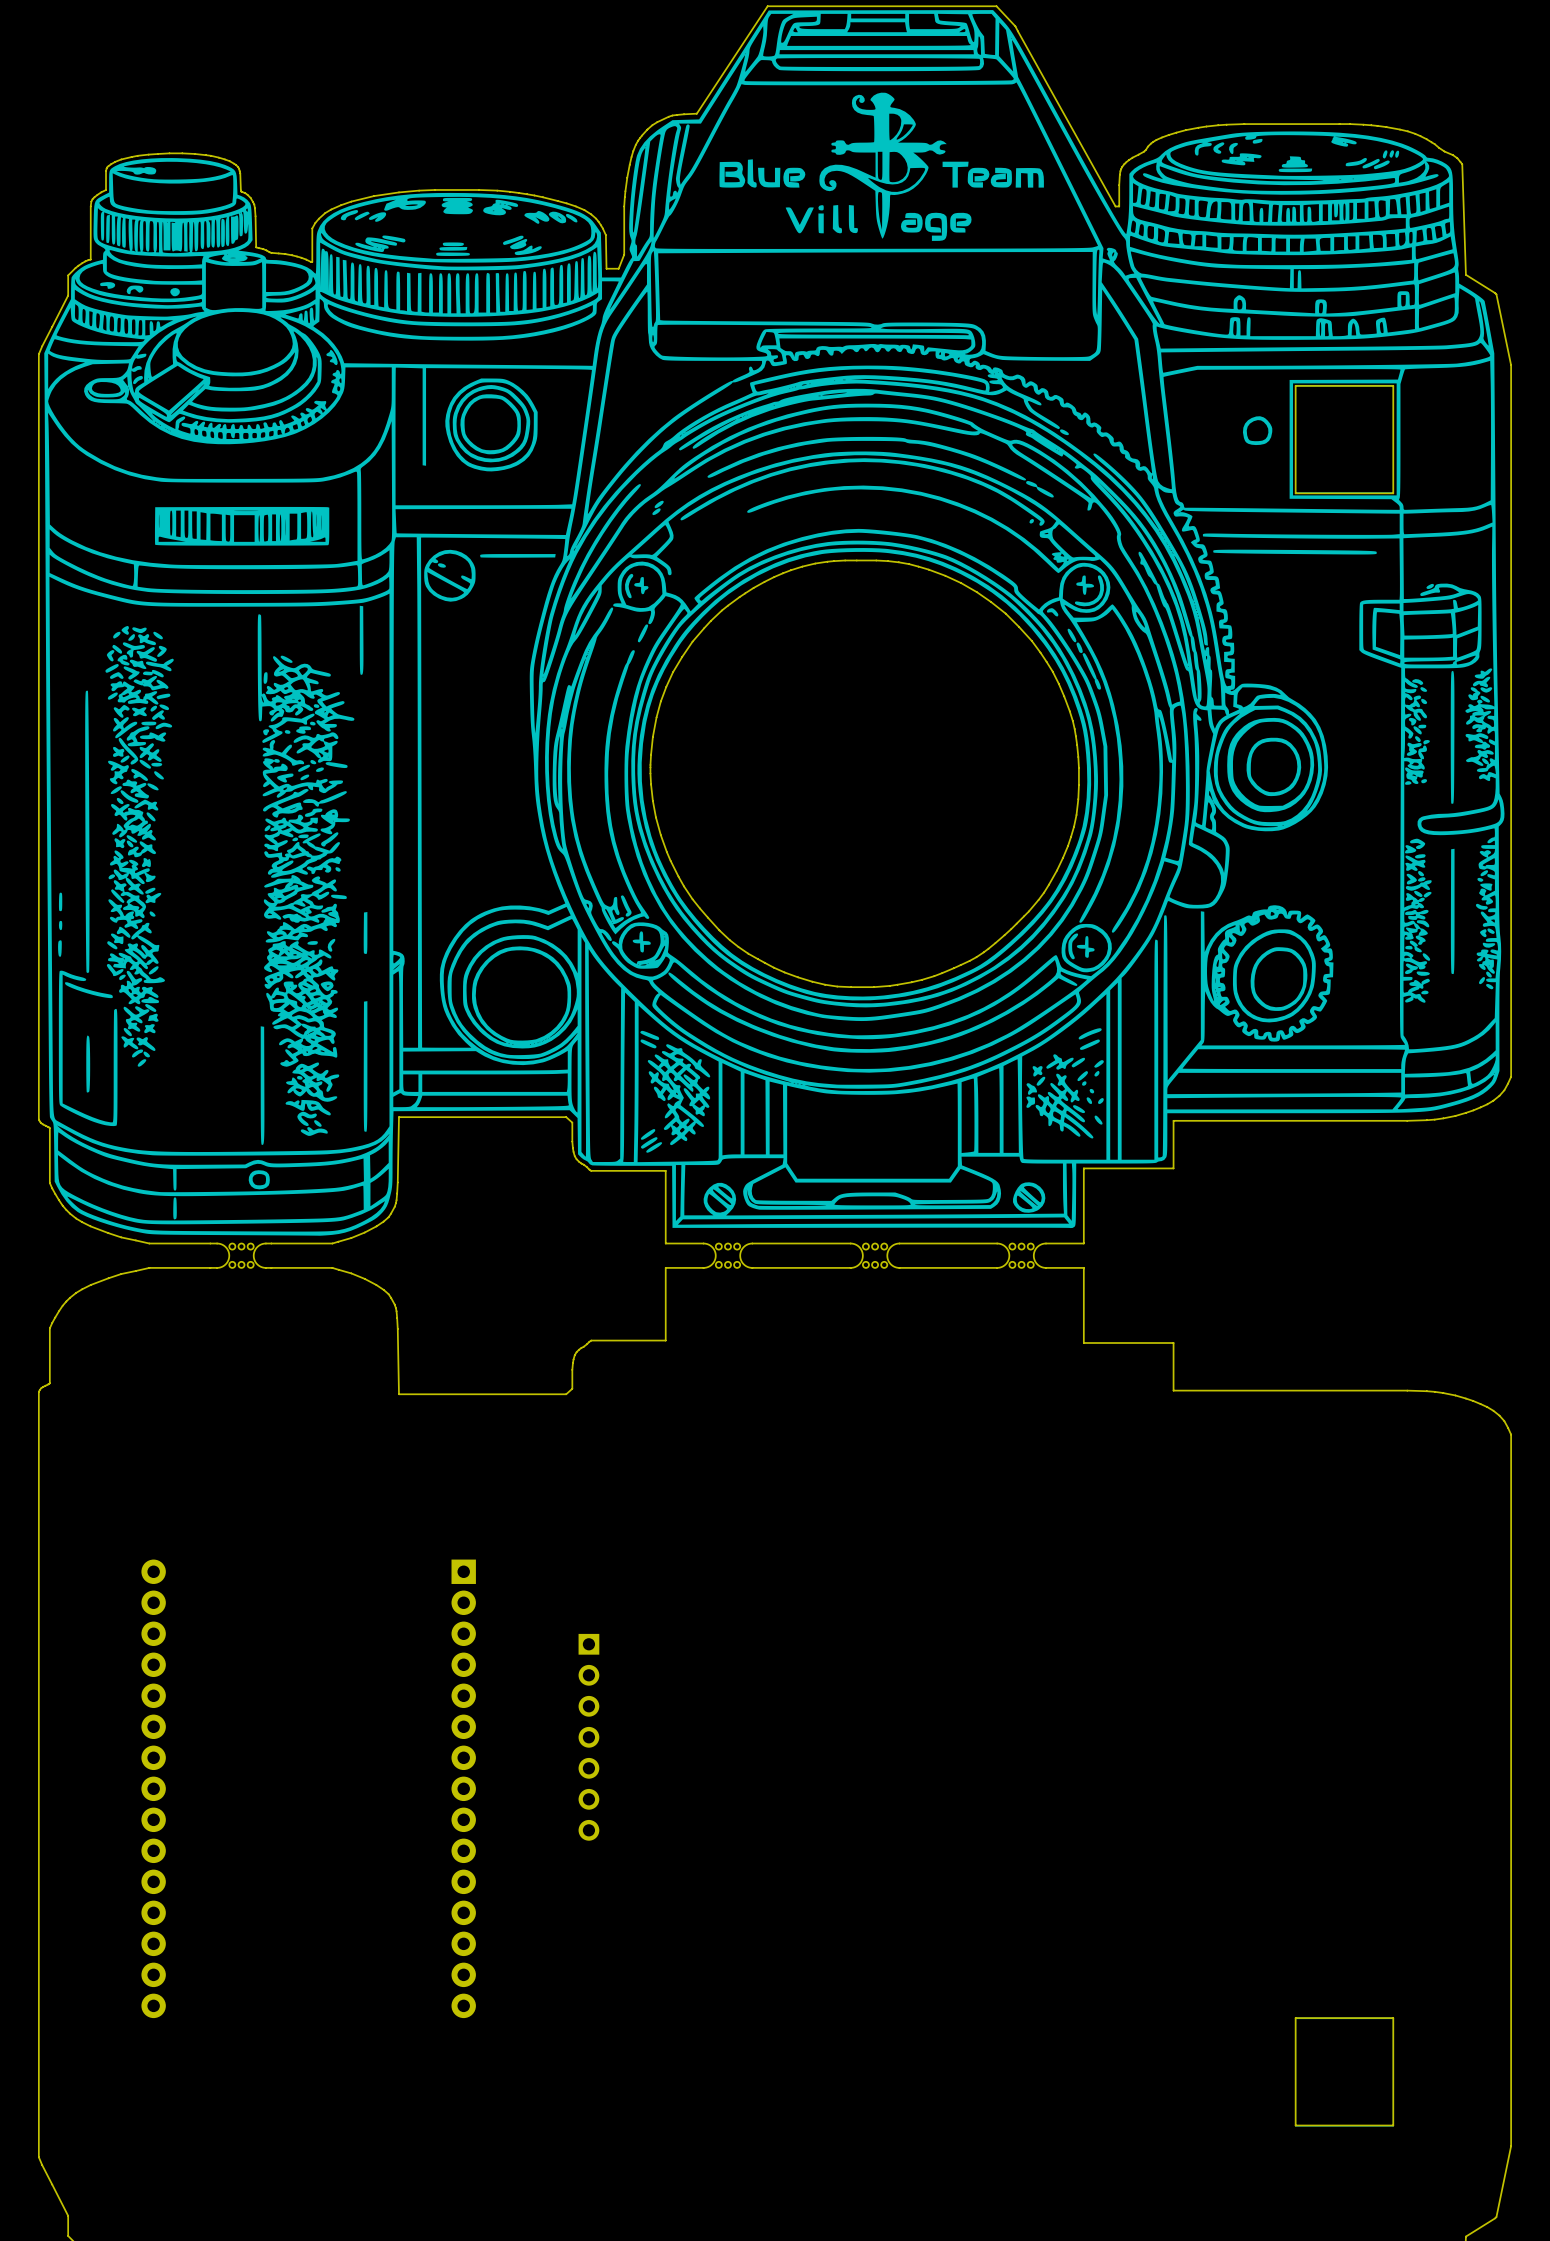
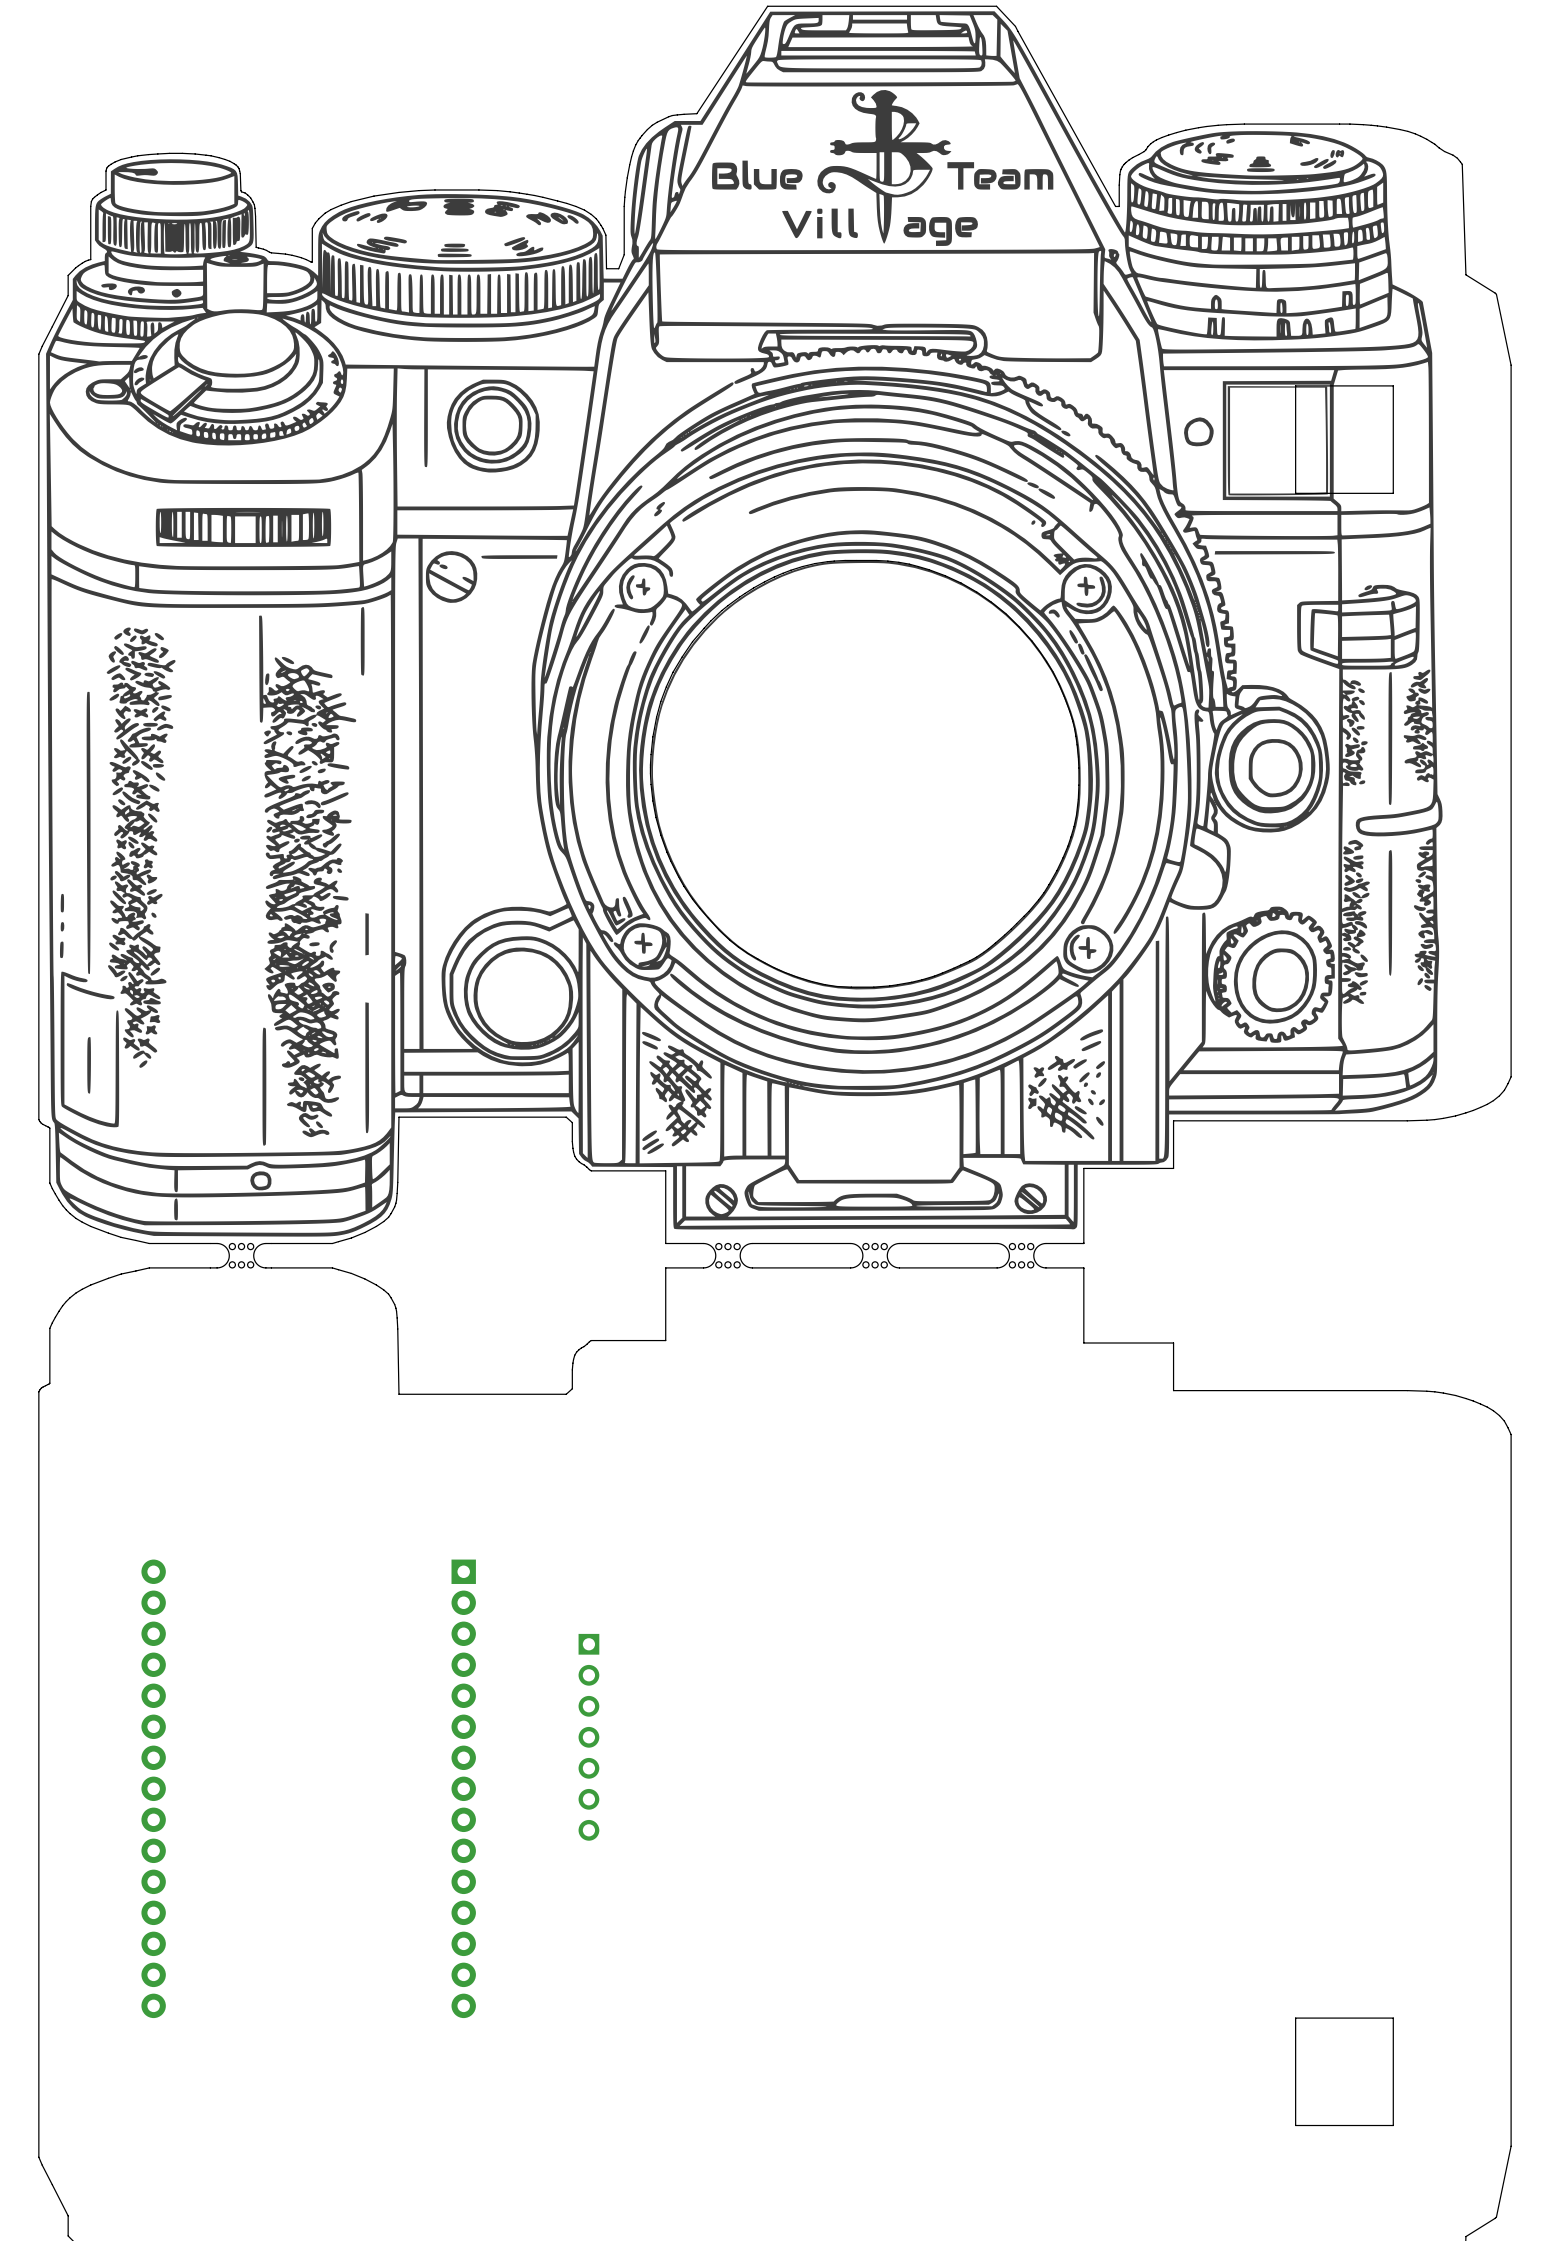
drawing: [44, 10, 1505, 2127] -> none
drawing: none -> [46, 11, 1443, 1237]

